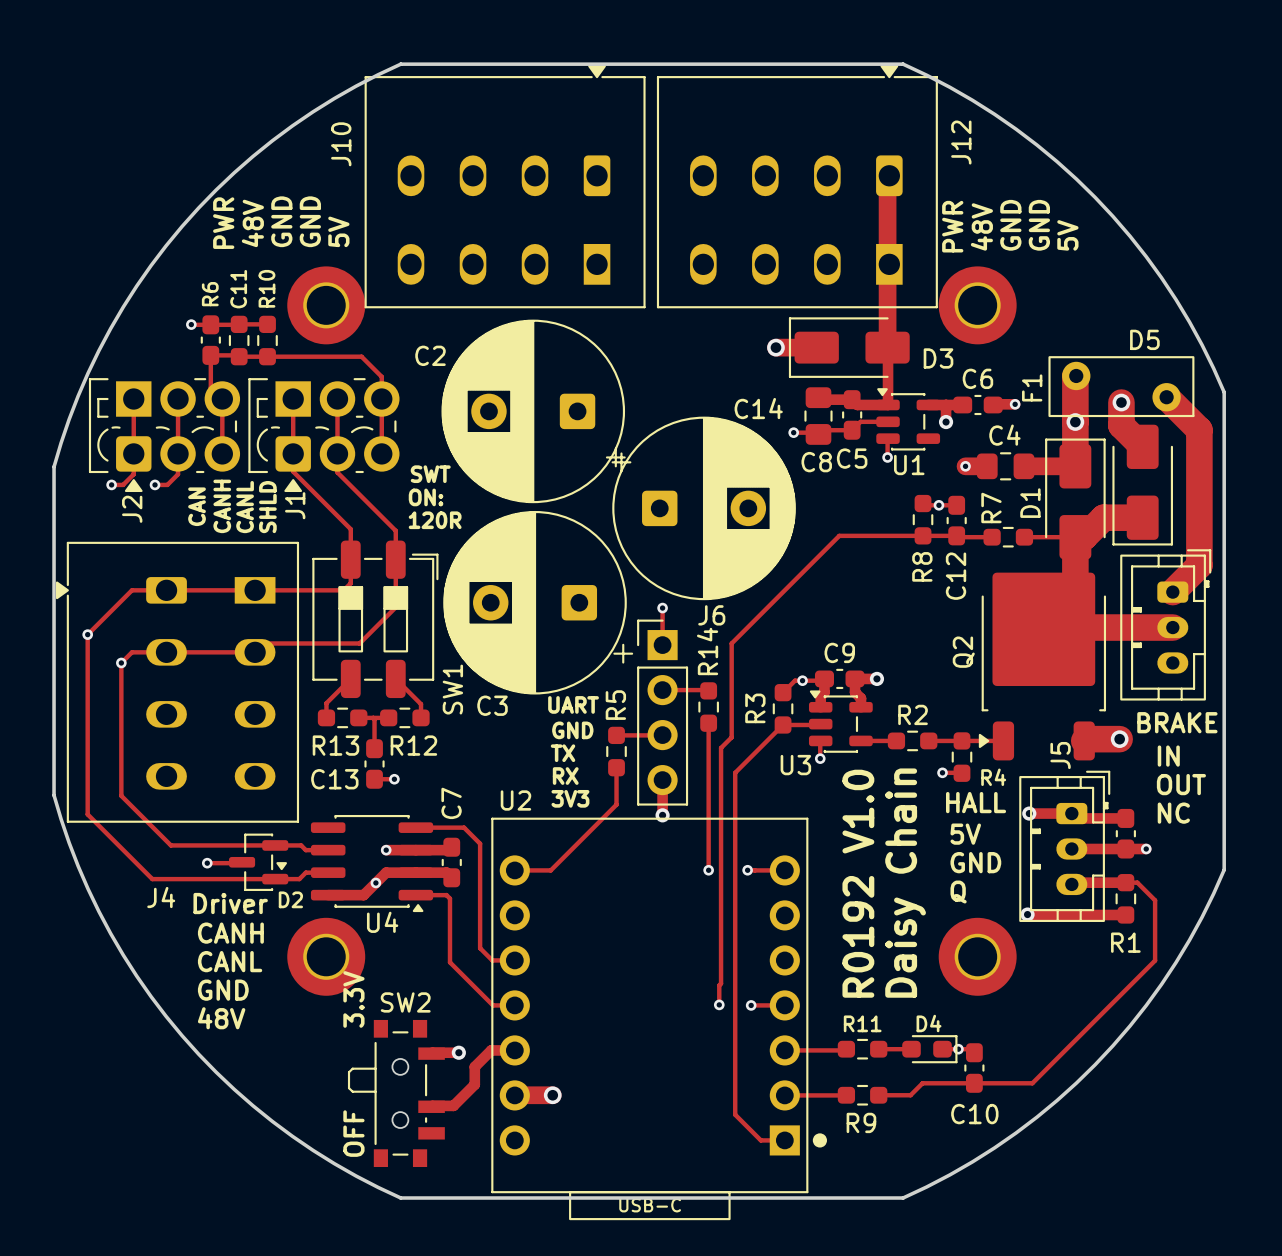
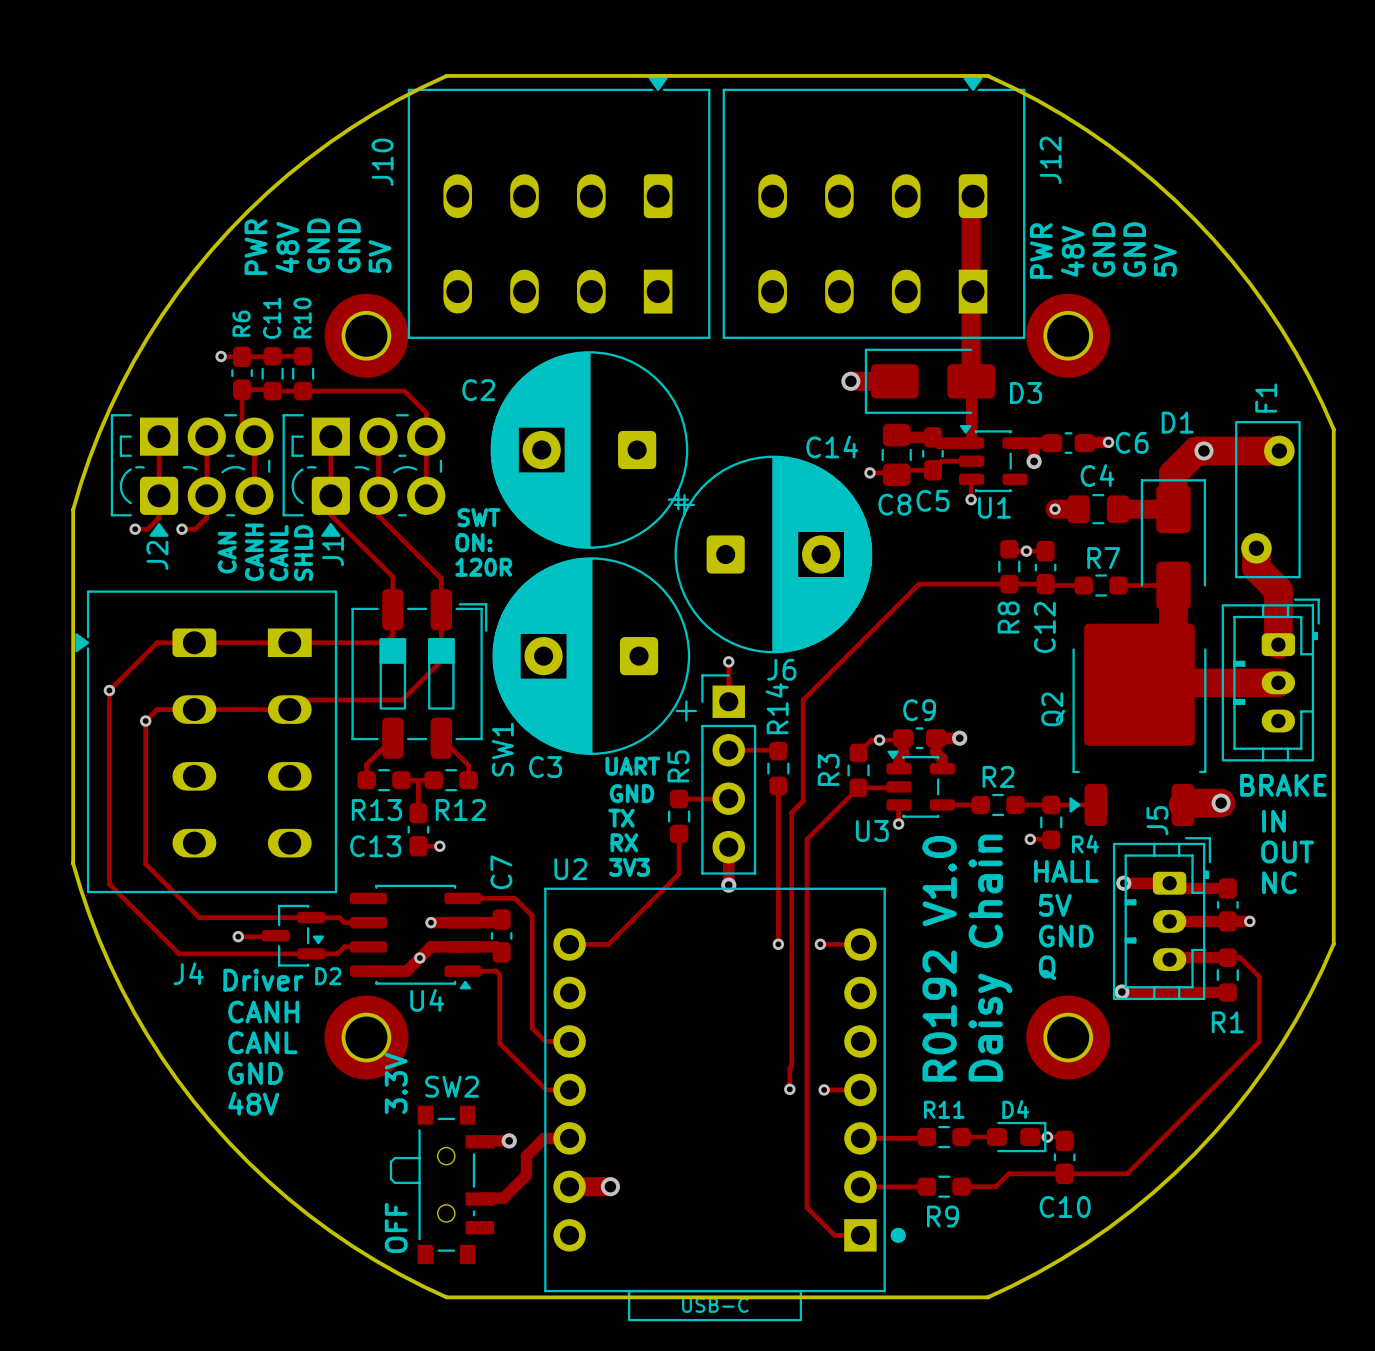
track: (1076, 375) (1075, 433) -> (1279, 450) (1196, 450) (1173, 473)
C6 name position: C6 (977, 378) -> C6 (1132, 442)
F1 rotation: 0° (1121, 386) -> 90° clockwise (1267, 499)
track: (1166, 397) (1199, 430) (1199, 565) (1172, 592) -> (1256, 548) (1256, 568) (1278, 590) (1278, 644)
track: (1121, 402) (1121, 425) (1142, 446) -> none
via: (1121, 402) -> none
via: none -> (1203, 450)
via: (1075, 422) -> none
D5: (1142, 485) -> none
D1 name rotation: 0° (1030, 503) -> 90° clockwise (1177, 422)
D1 name position: D1 (1030, 503) -> D1 (1177, 422)
R7 name rotation: 0° (991, 508) -> 90° clockwise (1103, 558)
track: (1142, 517) (1103, 517) (1084, 537) (1075, 537) -> none

